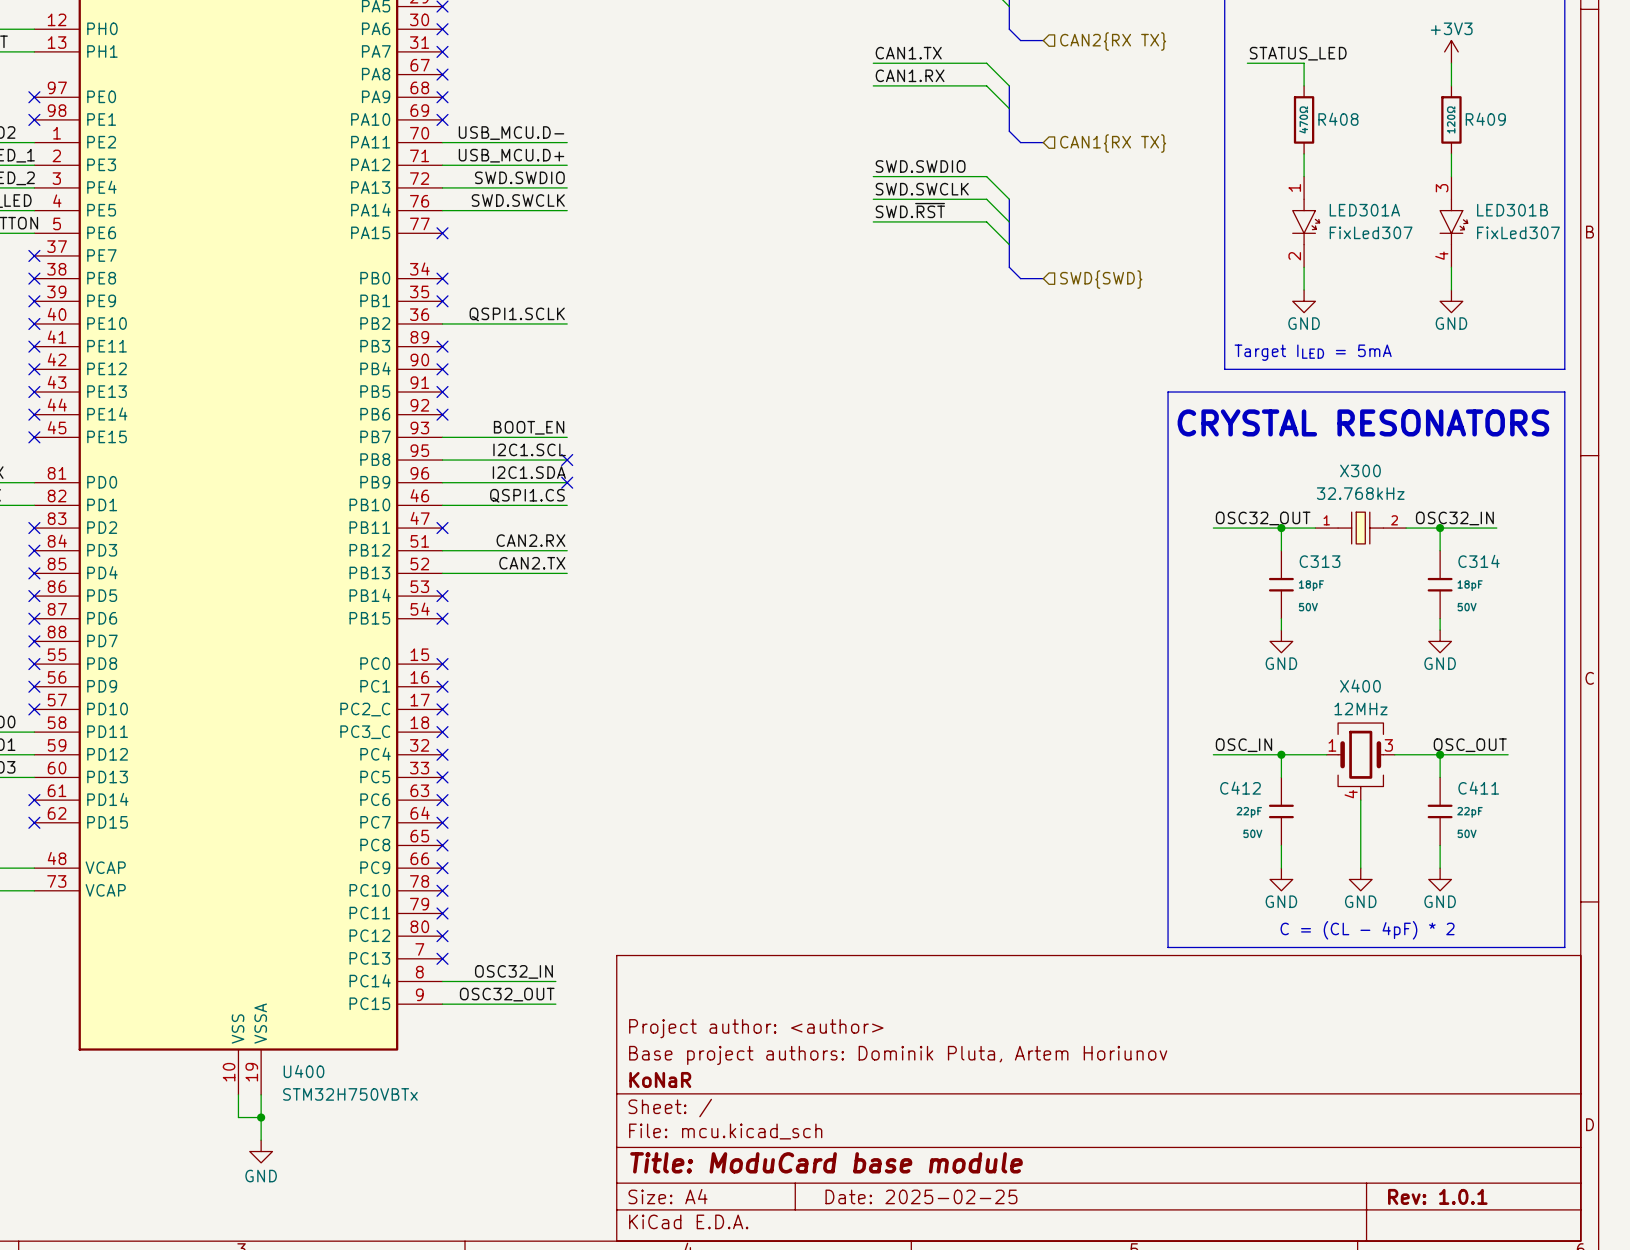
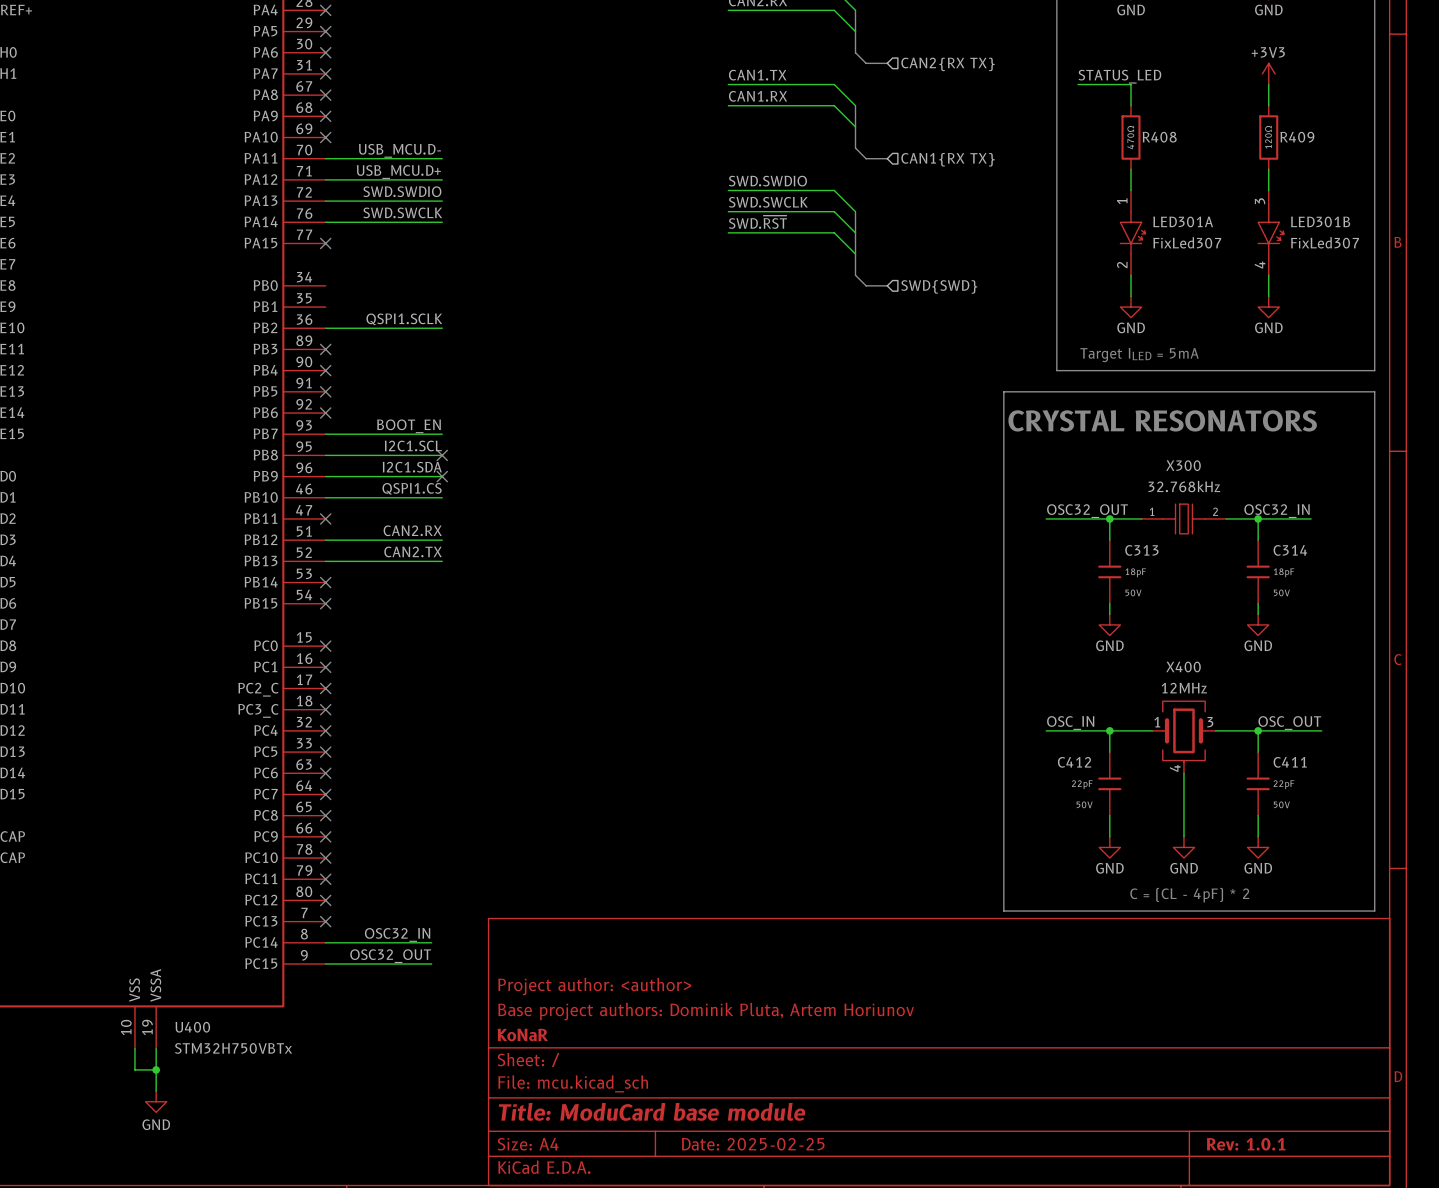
no-connect mark: (442, 278) -> none
no-connect mark: (442, 301) -> none

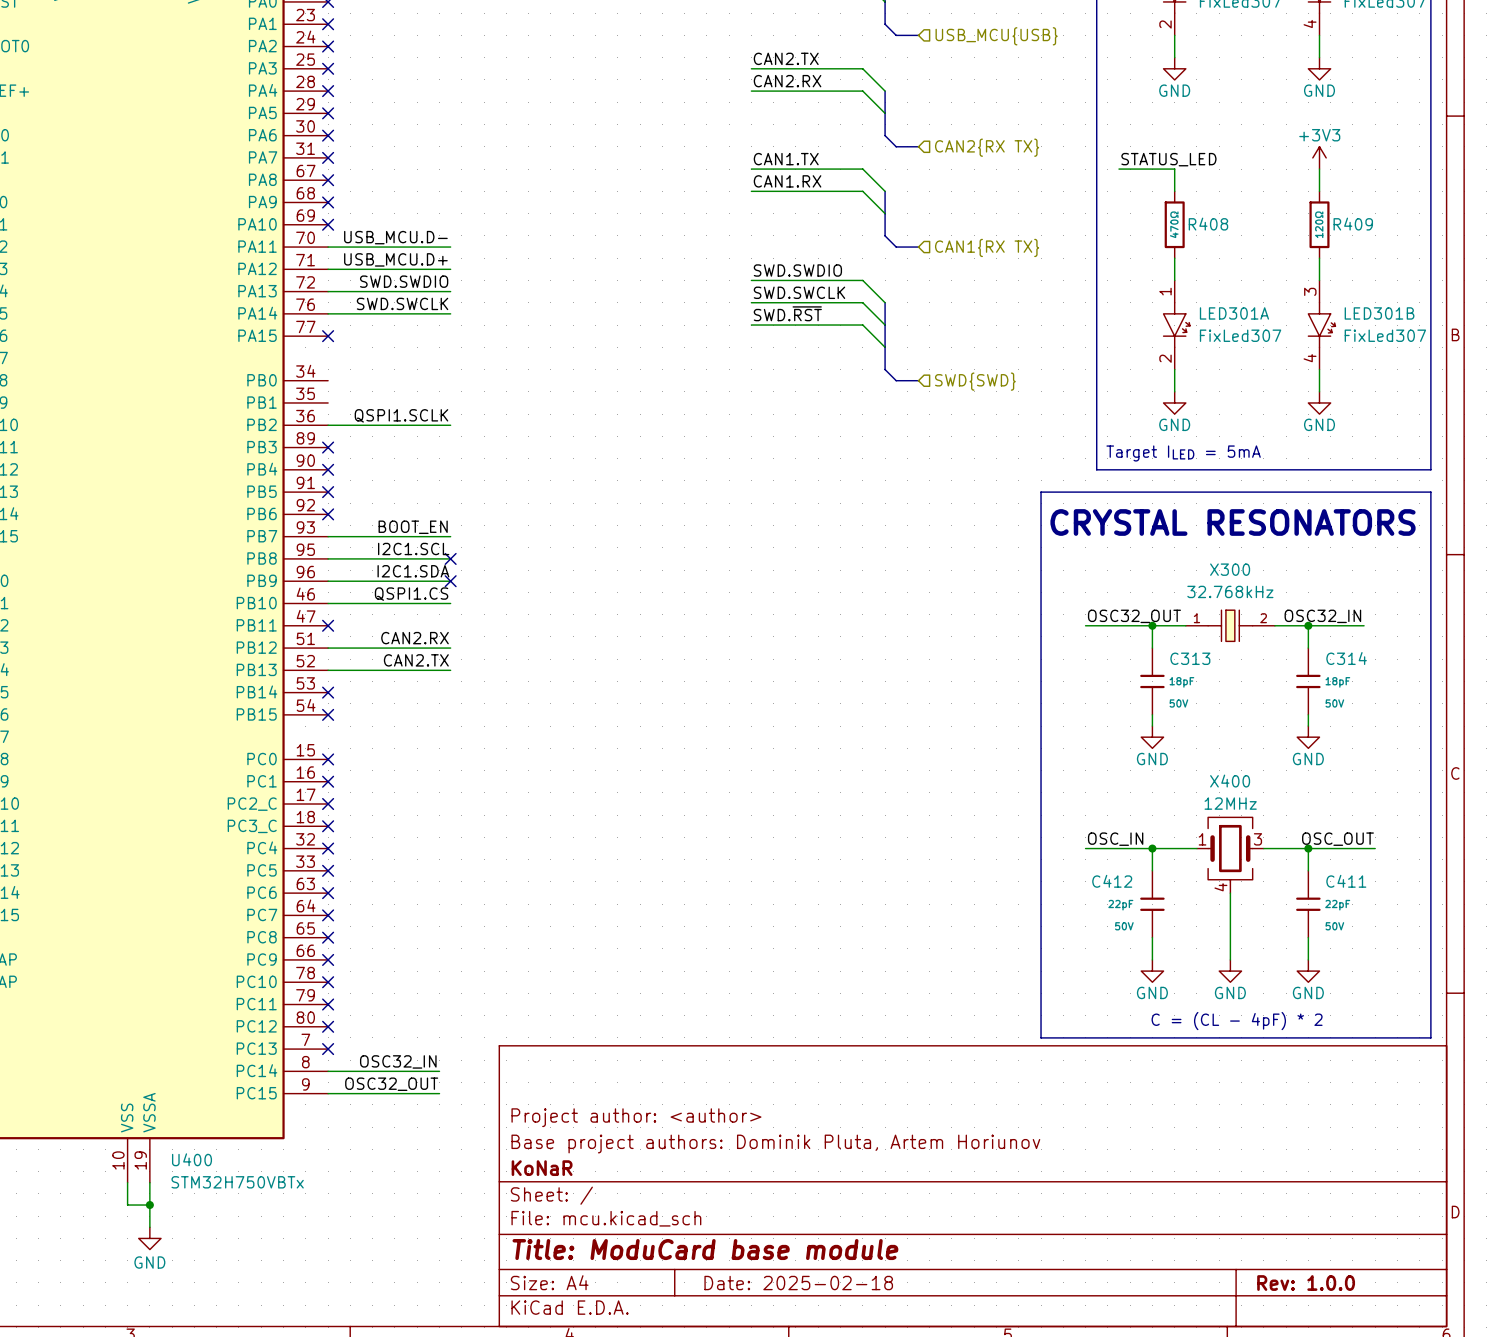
title block: Date: 2025-02-25 (753, 1144) -> Date: 2025-02-18 (798, 1283)
title block: Rev: 1.0.1 (1246, 1144) -> Rev: 1.0.0 (1306, 1283)

